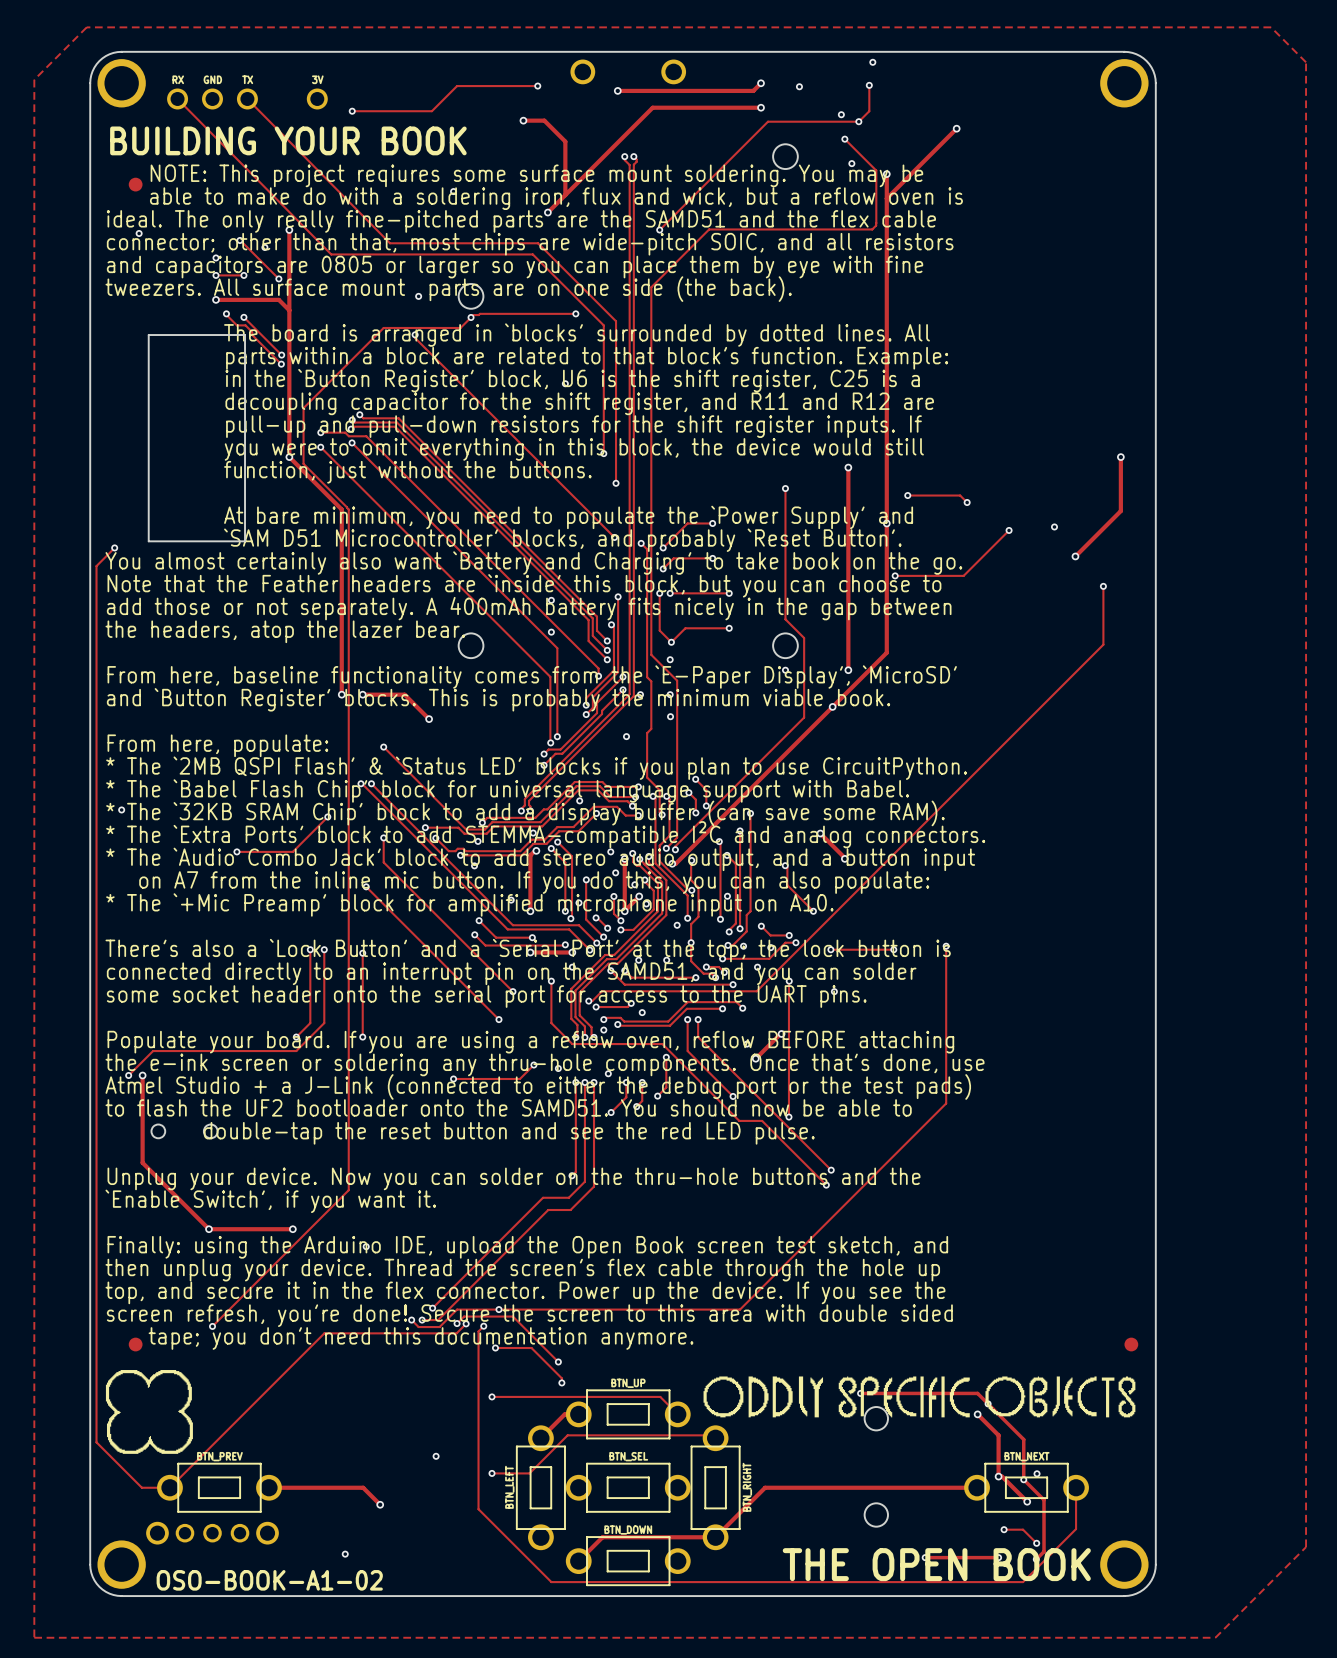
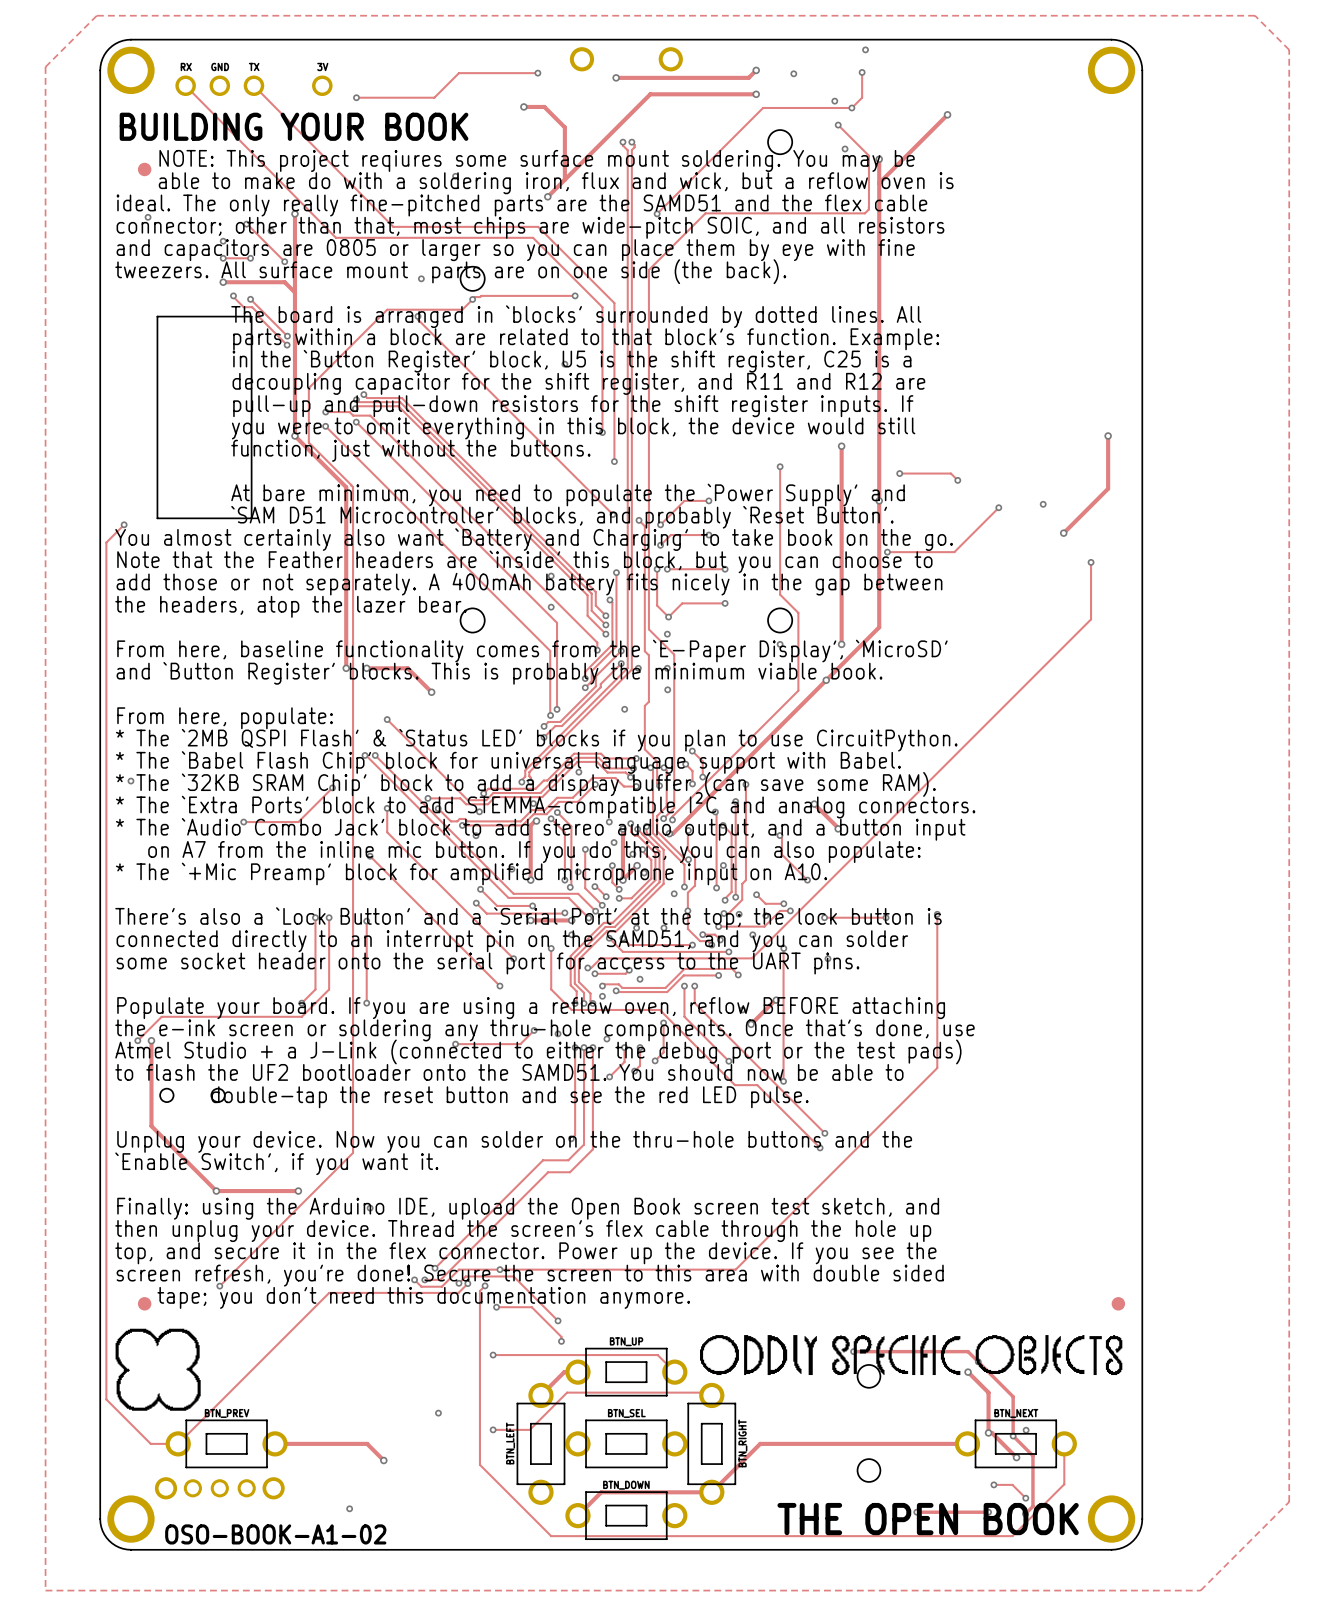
text: in the `Button Register' block, U6 is the shift register, C25 is a (572, 380) -> in the `Button Register' block, U5 is the shift register, C25 is a (571, 361)

